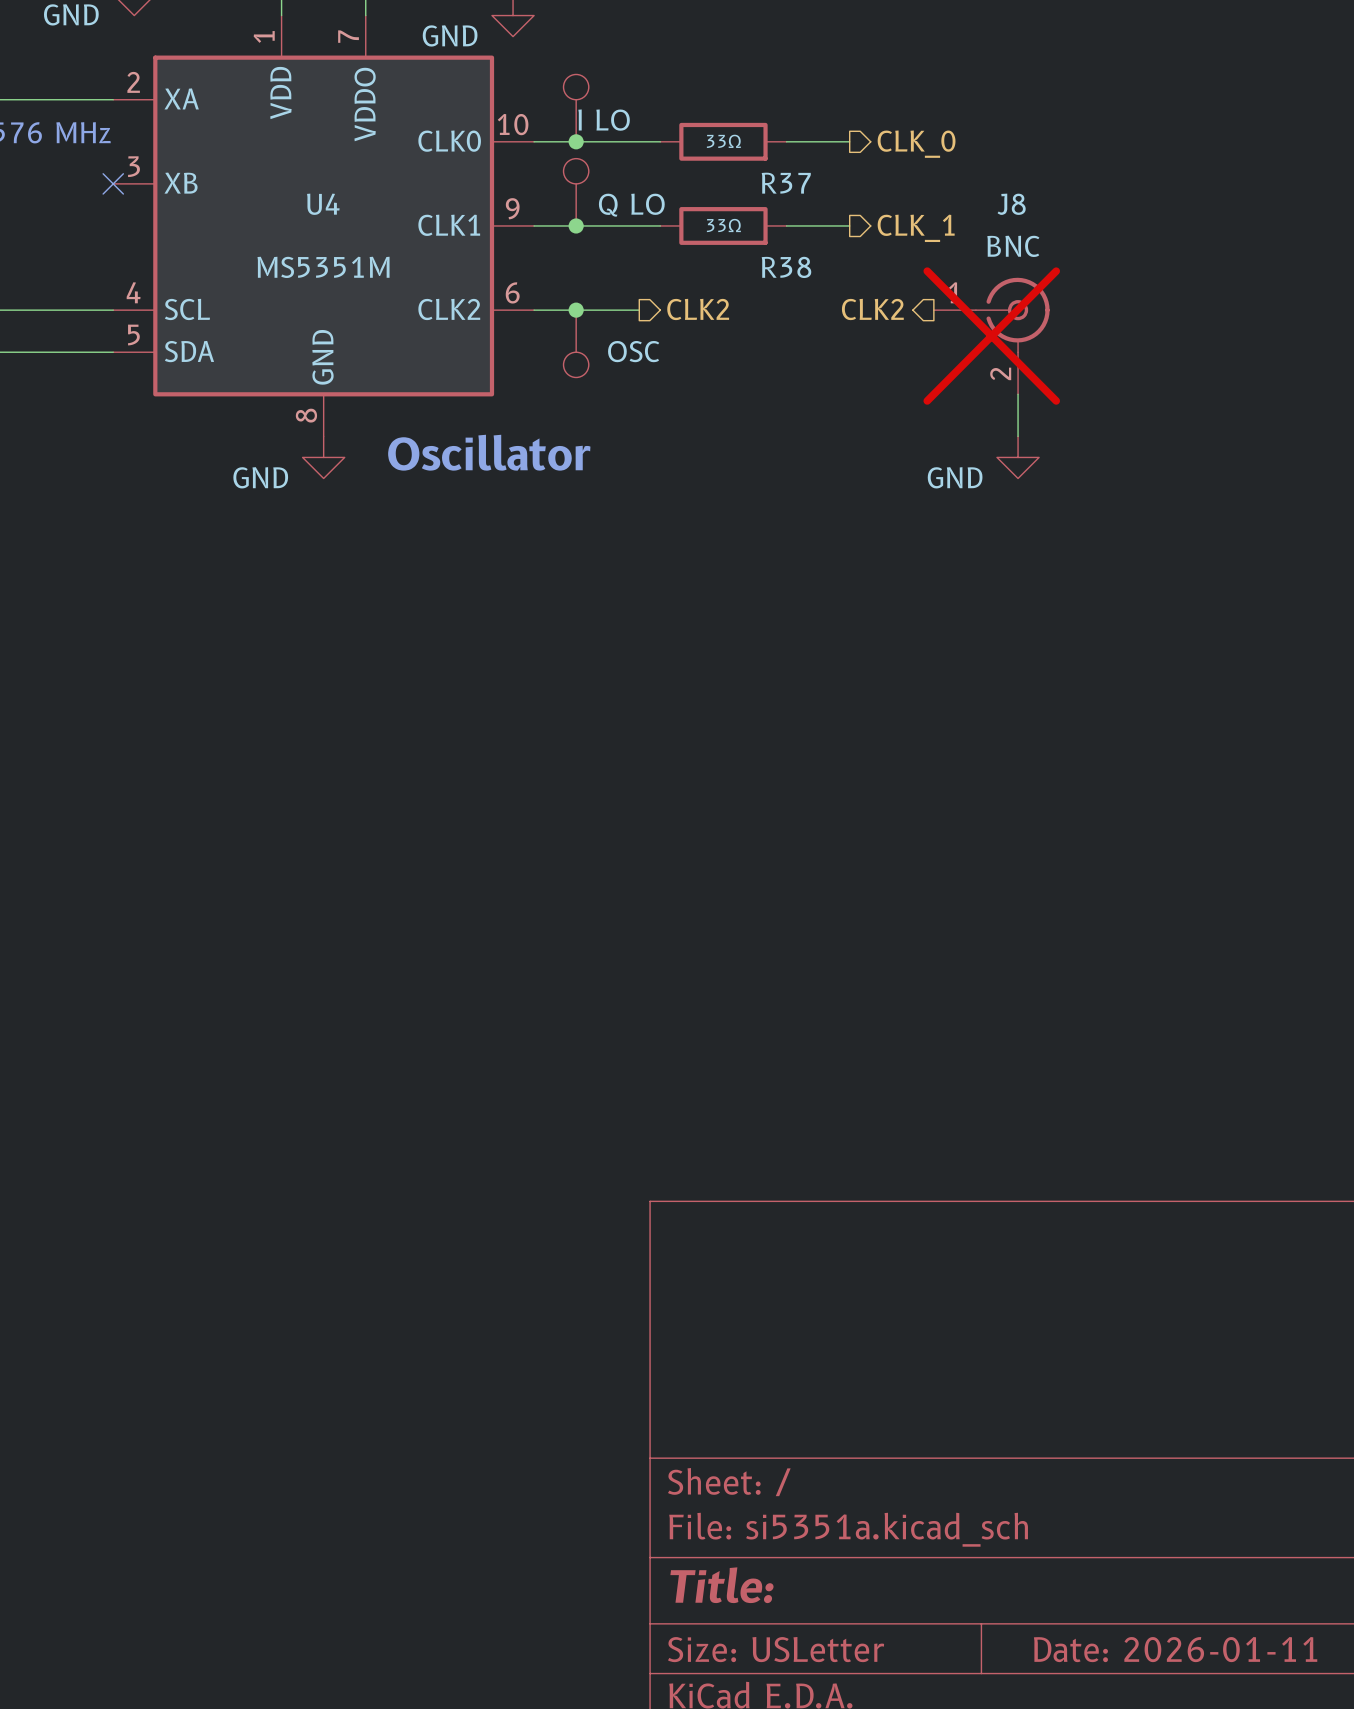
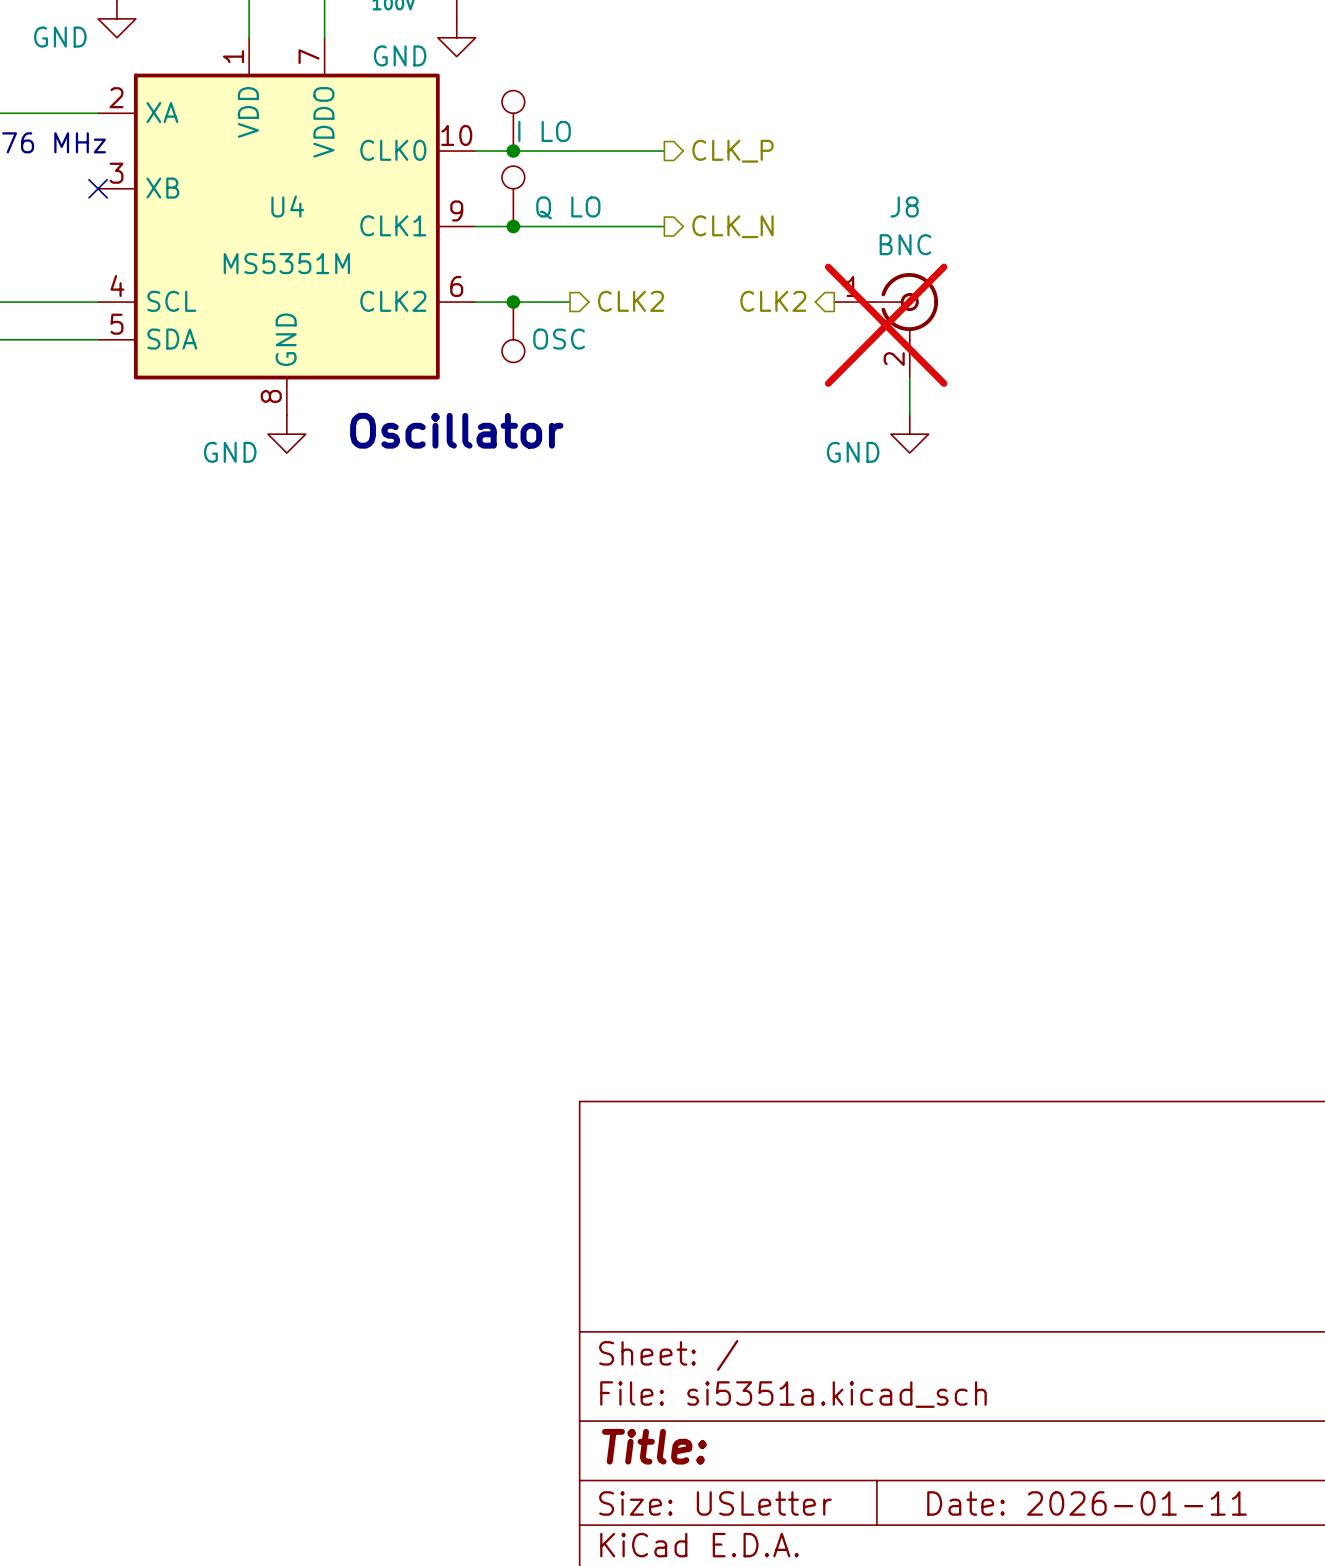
wire: none -> (588, 151) (664, 151)
R37: 33Ω (723, 141) -> none
wire: (786, 141) (849, 141) -> none
hierarchical label: CLK_0 (916, 144) -> CLK_P (732, 151)
wire: none -> (588, 226) (664, 226)
R38: 33Ω (723, 225) -> none
wire: (786, 225) (849, 225) -> none
hierarchical label: CLK_1 (916, 228) -> CLK_N (732, 226)

